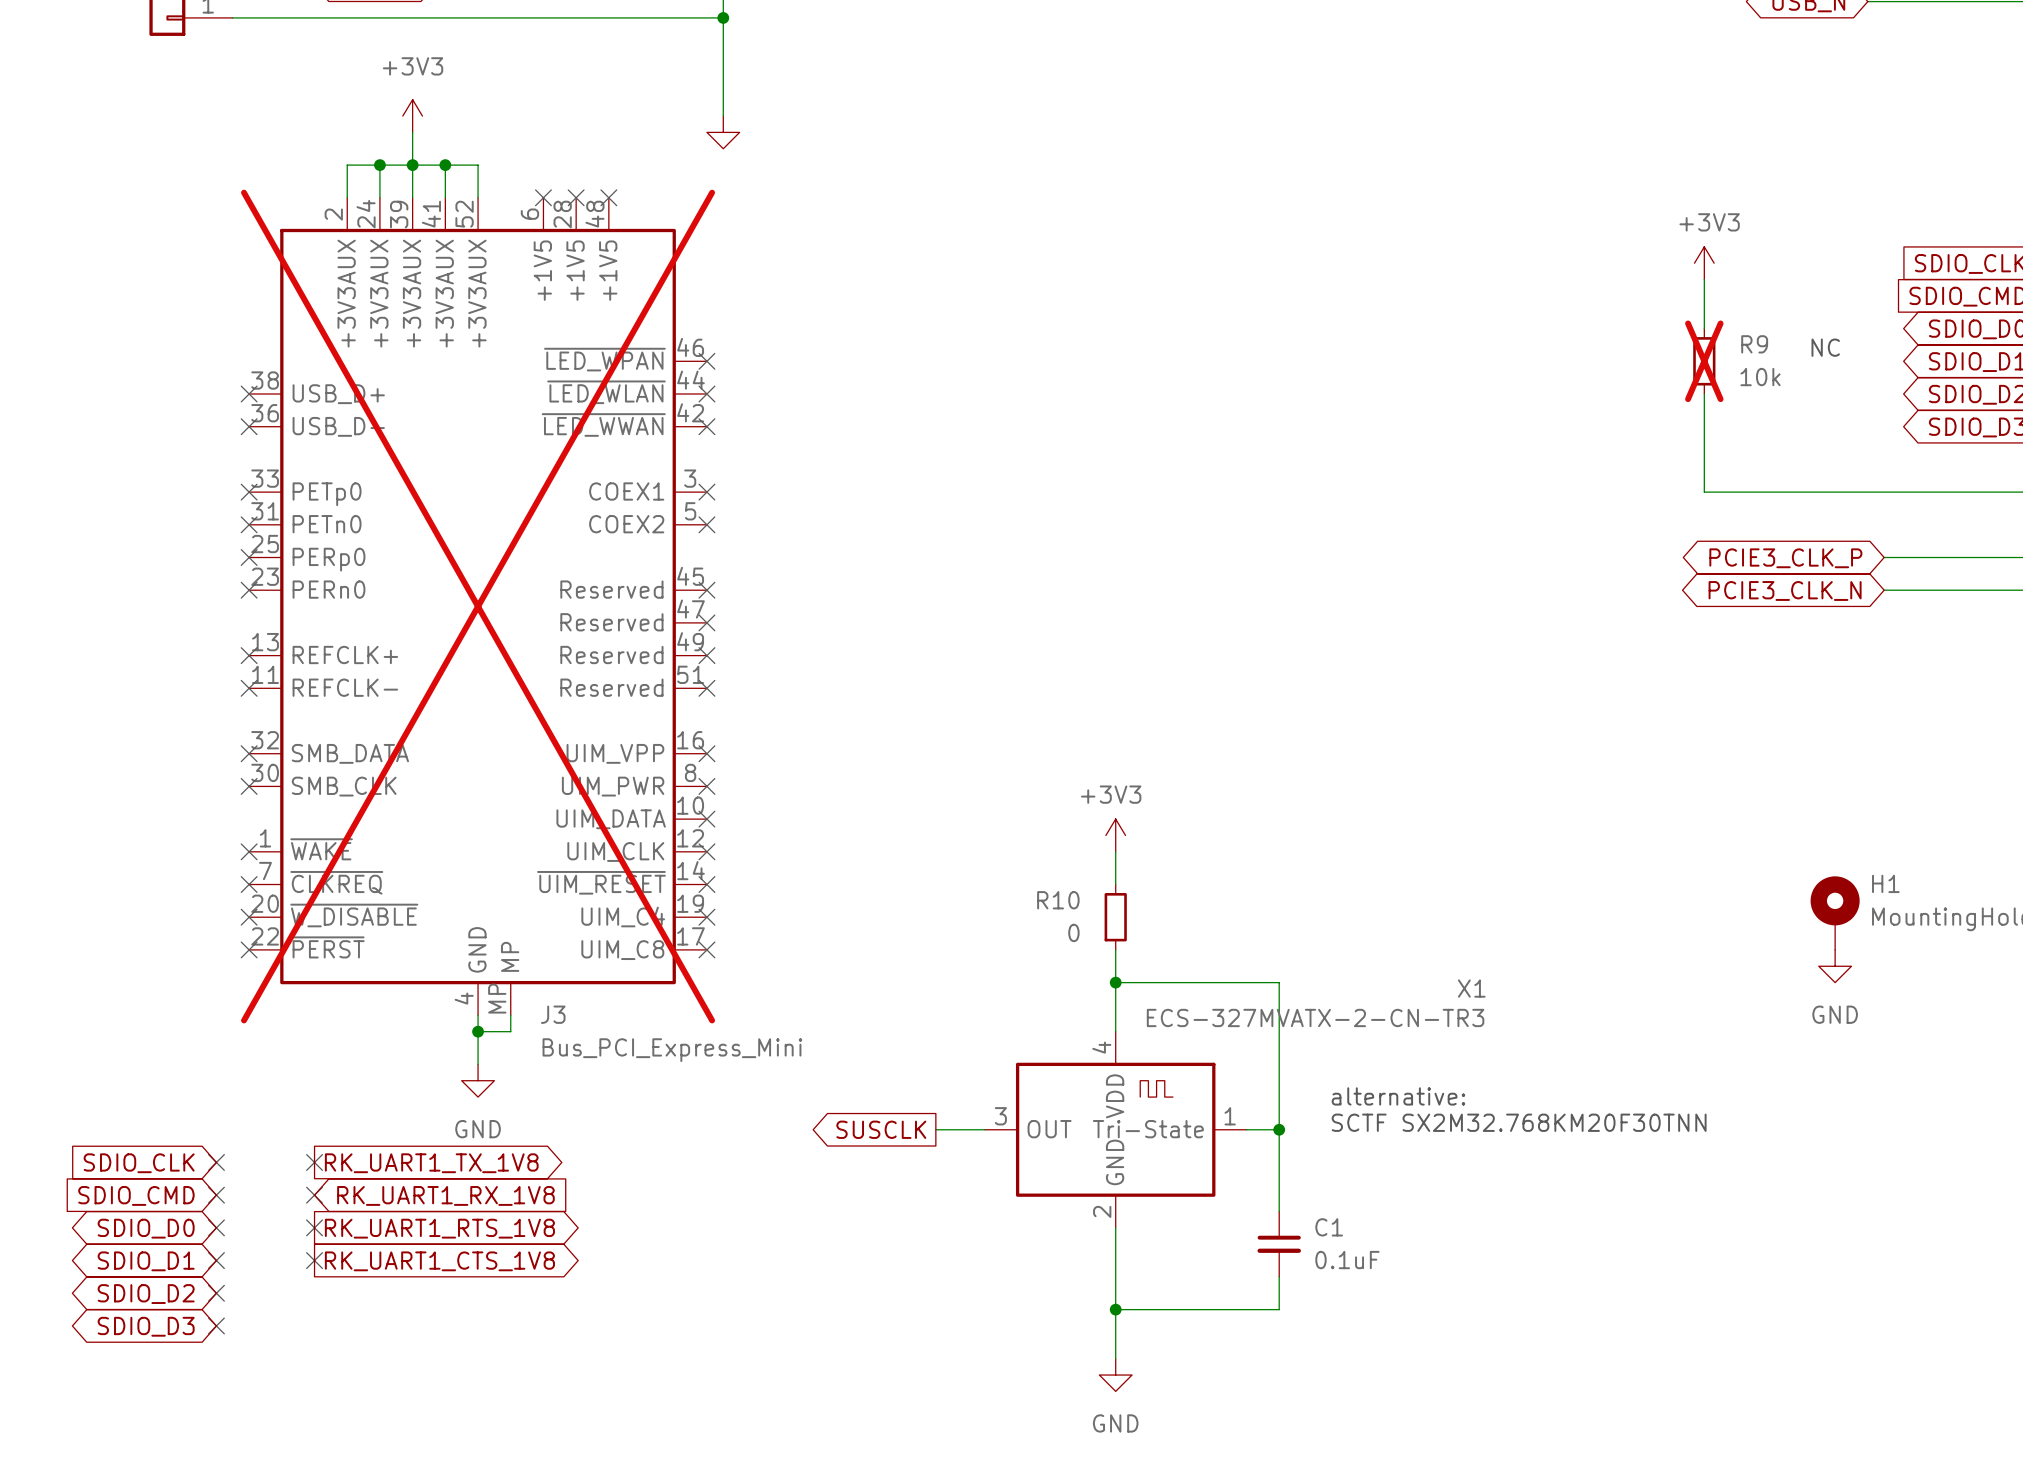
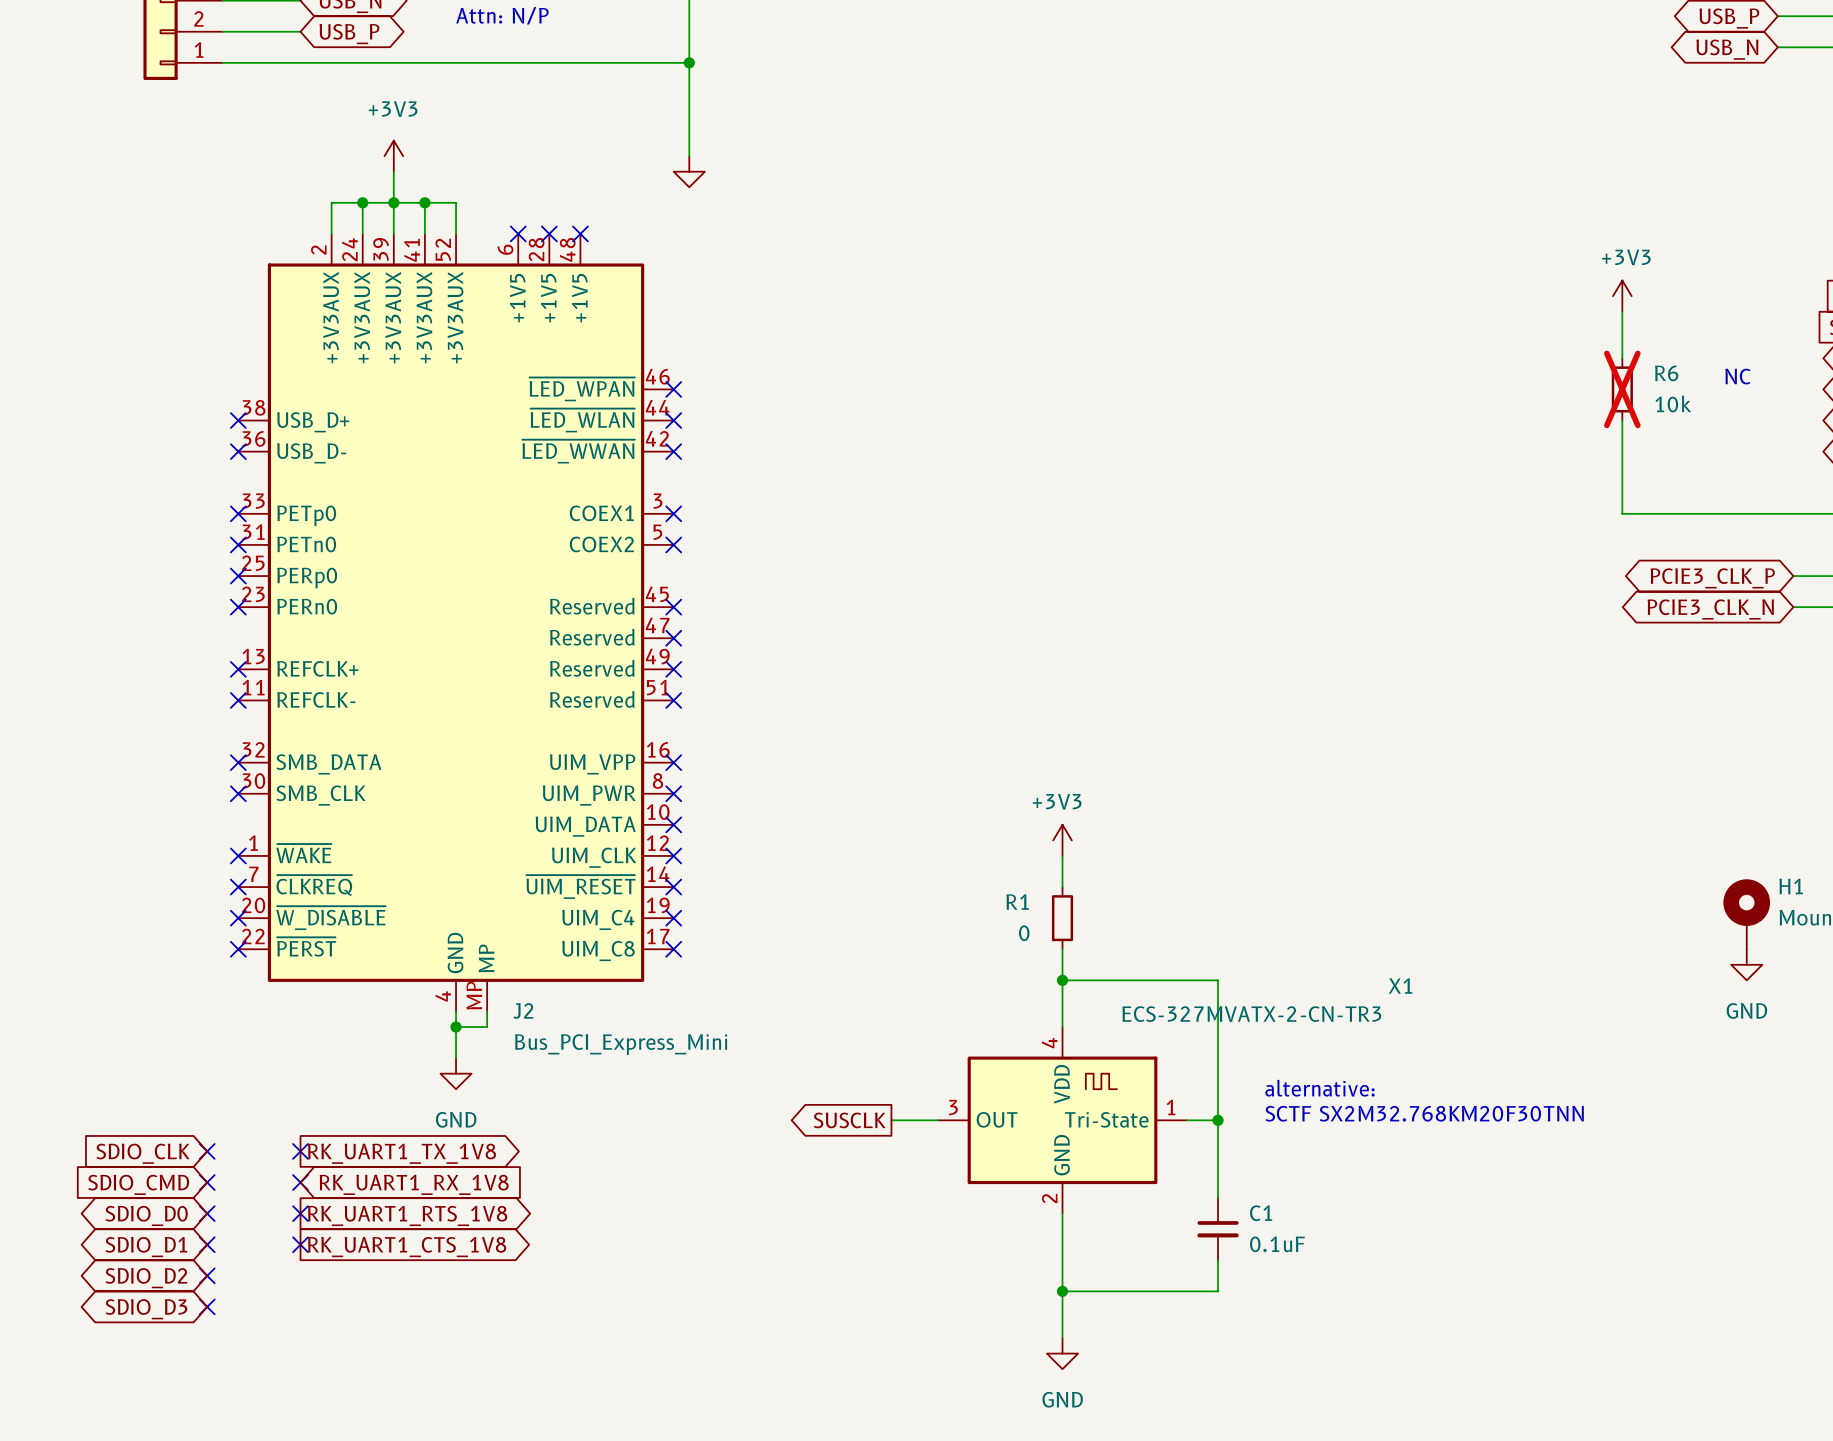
R9 name: R9 (1754, 344) -> R6 (1666, 373)
J3 do-not-place cross: (478, 606) -> none
R10 name: R10 (1058, 900) -> R1 (1017, 902)
J3 name: J3 (553, 1014) -> J2 (523, 1010)

